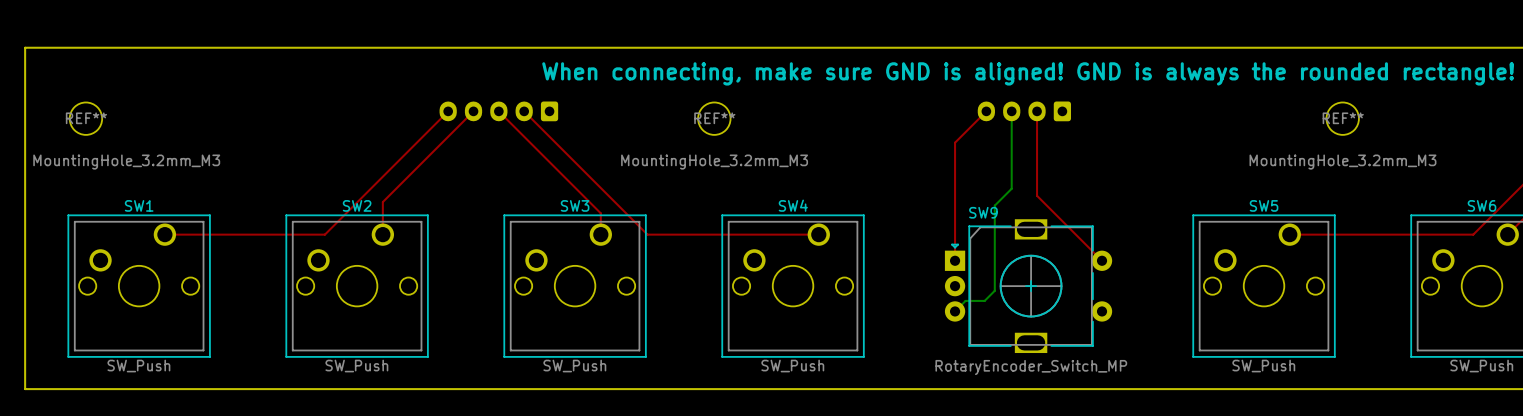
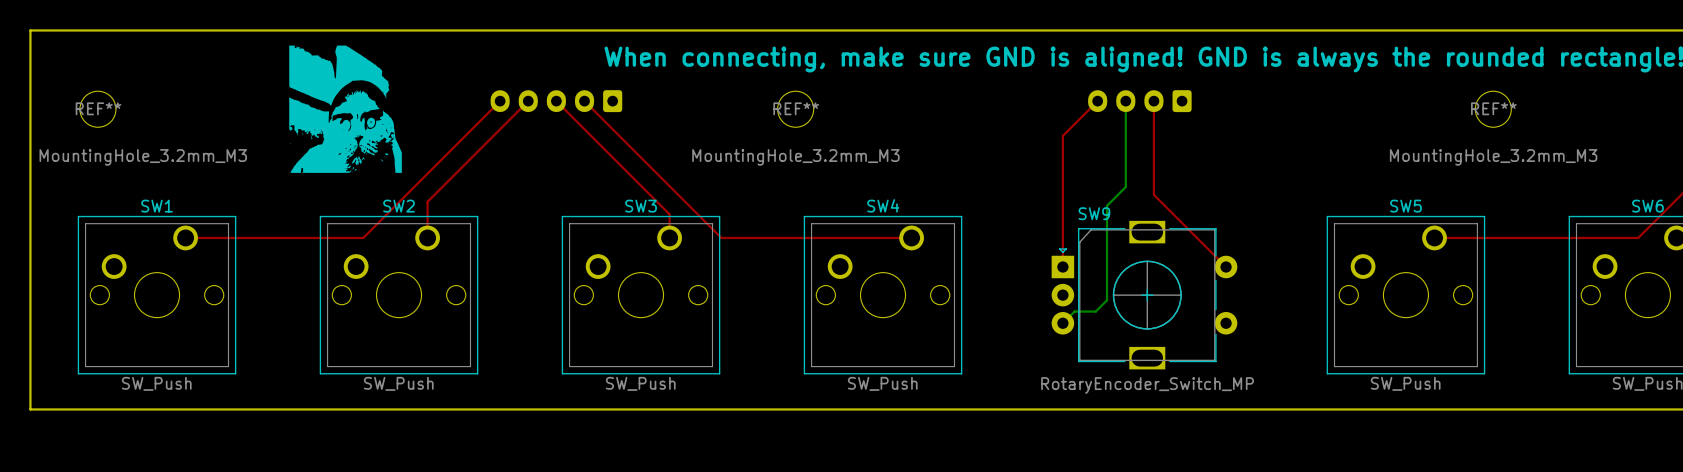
drawing: none -> [289, 45, 402, 173]

